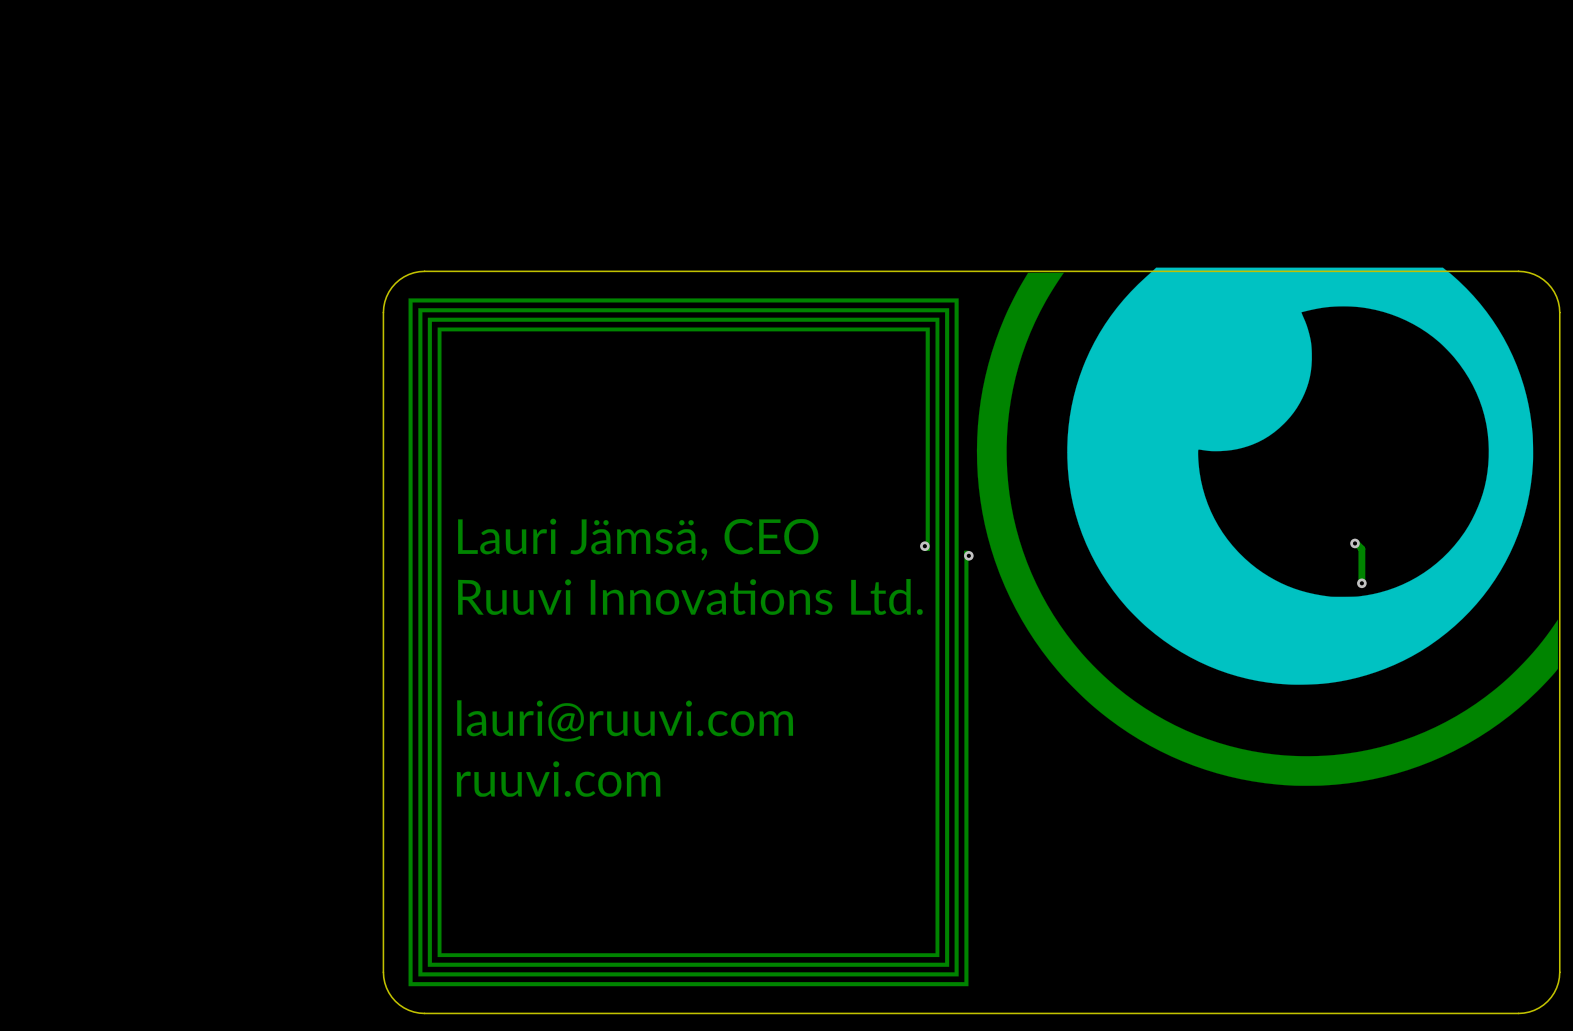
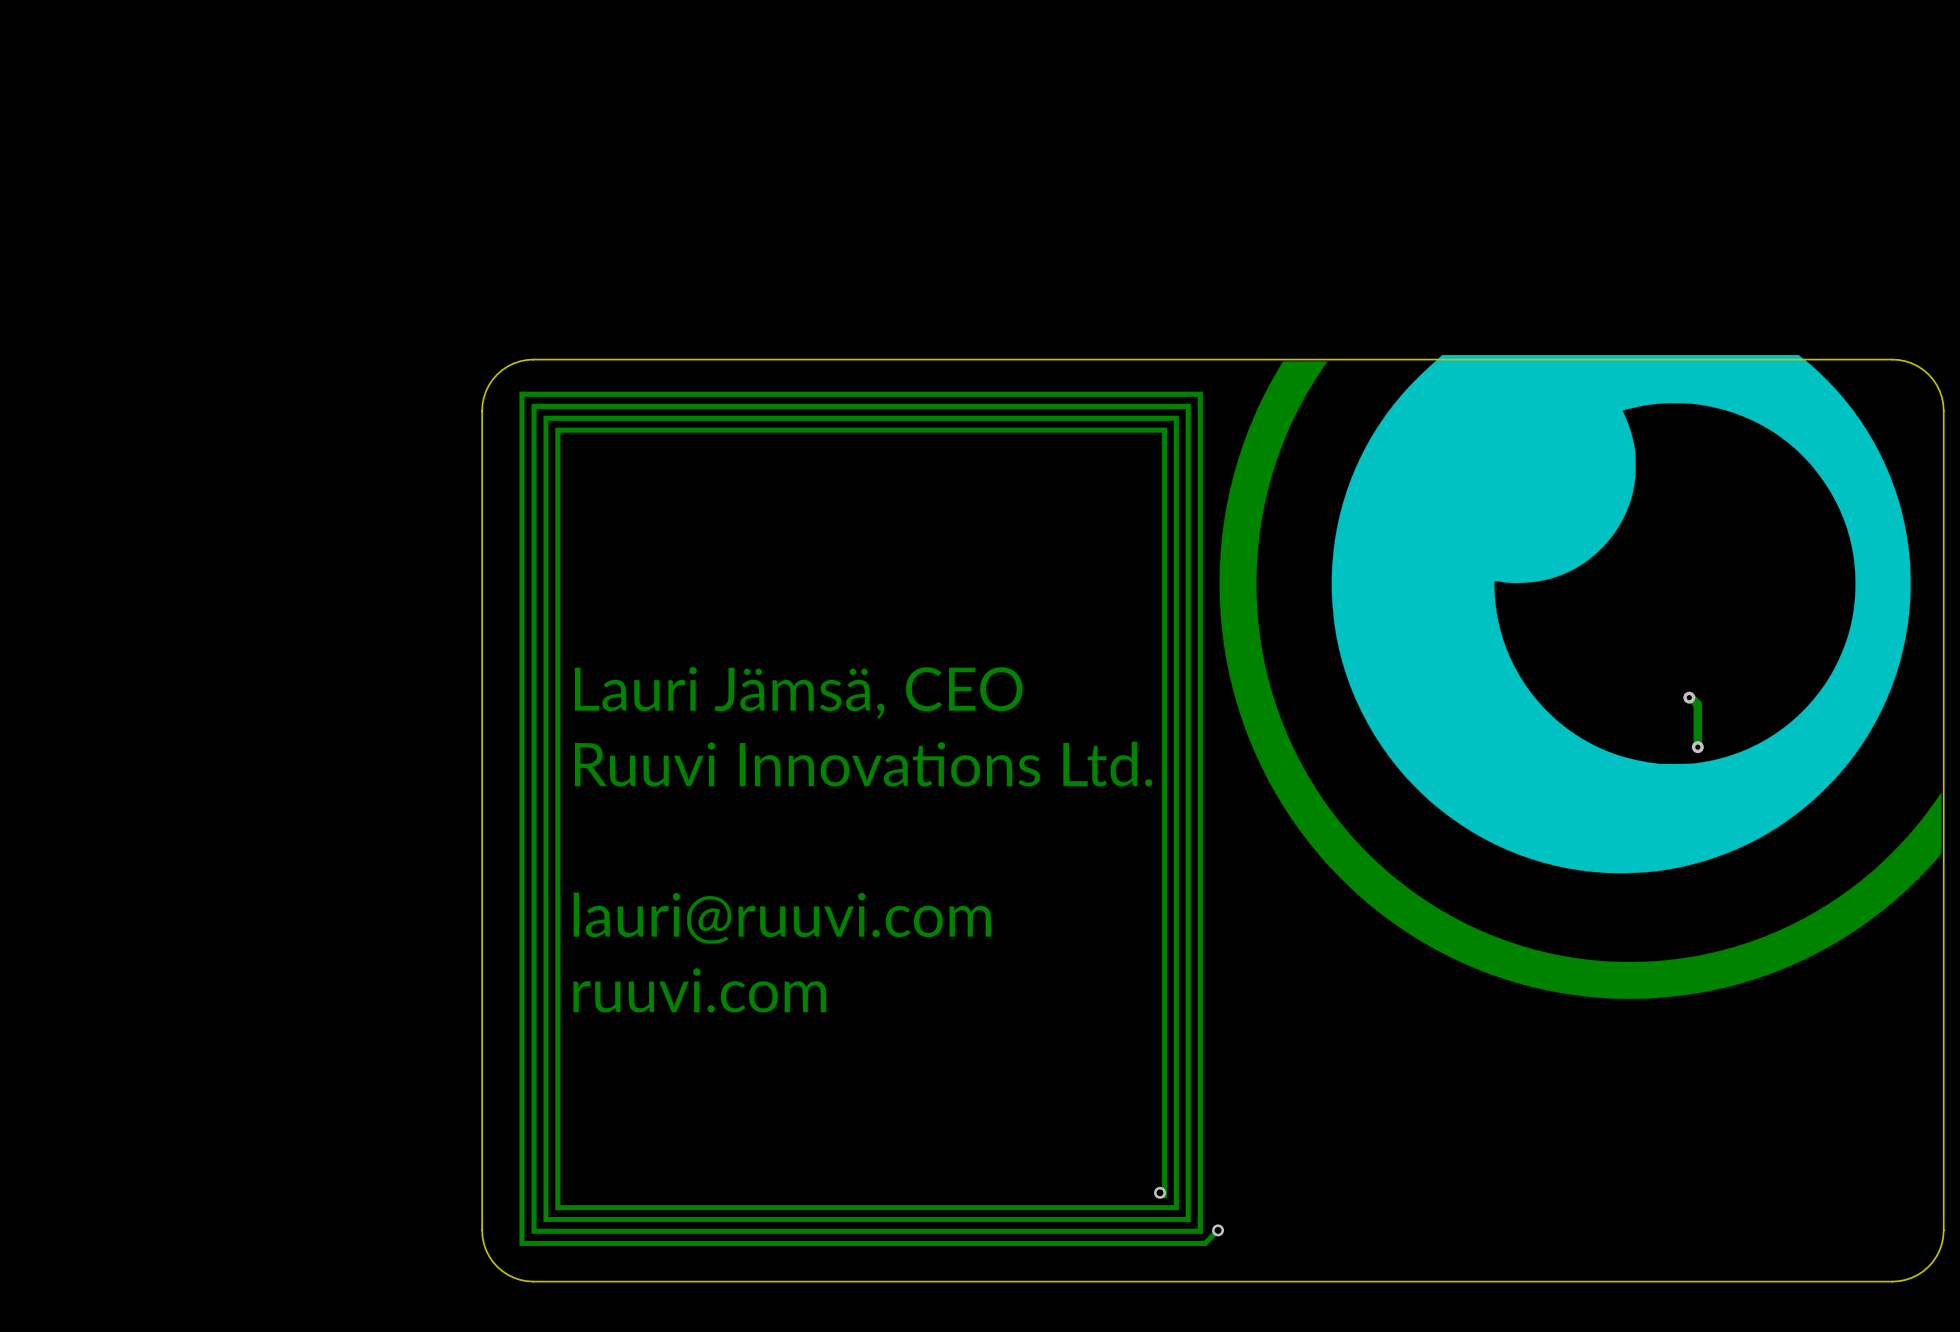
part footprint: [408, 298, 969, 987] -> [519, 391, 1203, 1247]
via: (924, 546) -> none
via: (968, 555) -> none
via: none -> (1159, 1192)
track: none -> (1218, 1230) (1204, 1243) (1200, 1243)
via: none -> (1218, 1230)

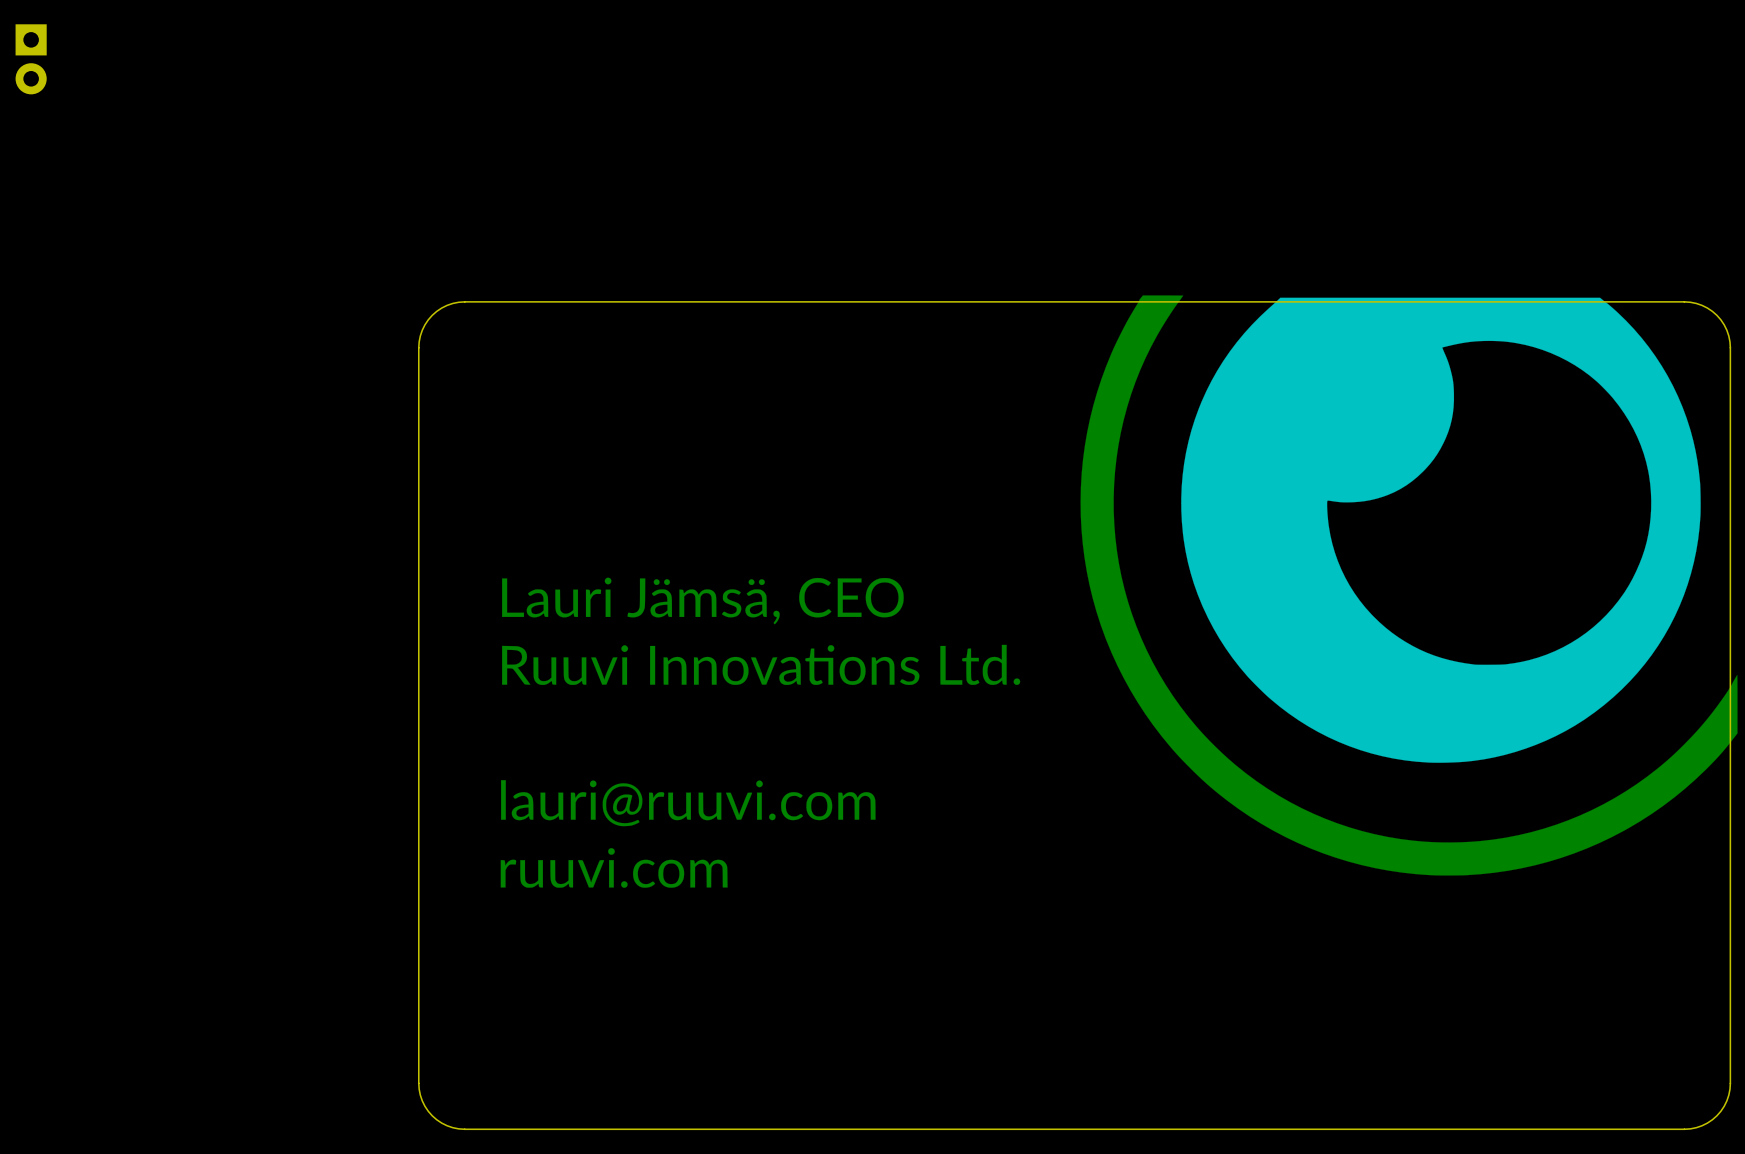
part: none -> (31, 59)
drawing shape: [573, 361, 1942, 1013] -> [500, 295, 1738, 888]
track: (1689, 697) (1697, 704) (1697, 747) -> none
via: (1689, 697) -> none
via: (1697, 747) -> none
part: (861, 818) -> none
via: (1159, 1192) -> none
track: (1218, 1230) (1204, 1243) (1200, 1243) -> none
via: (1218, 1230) -> none

